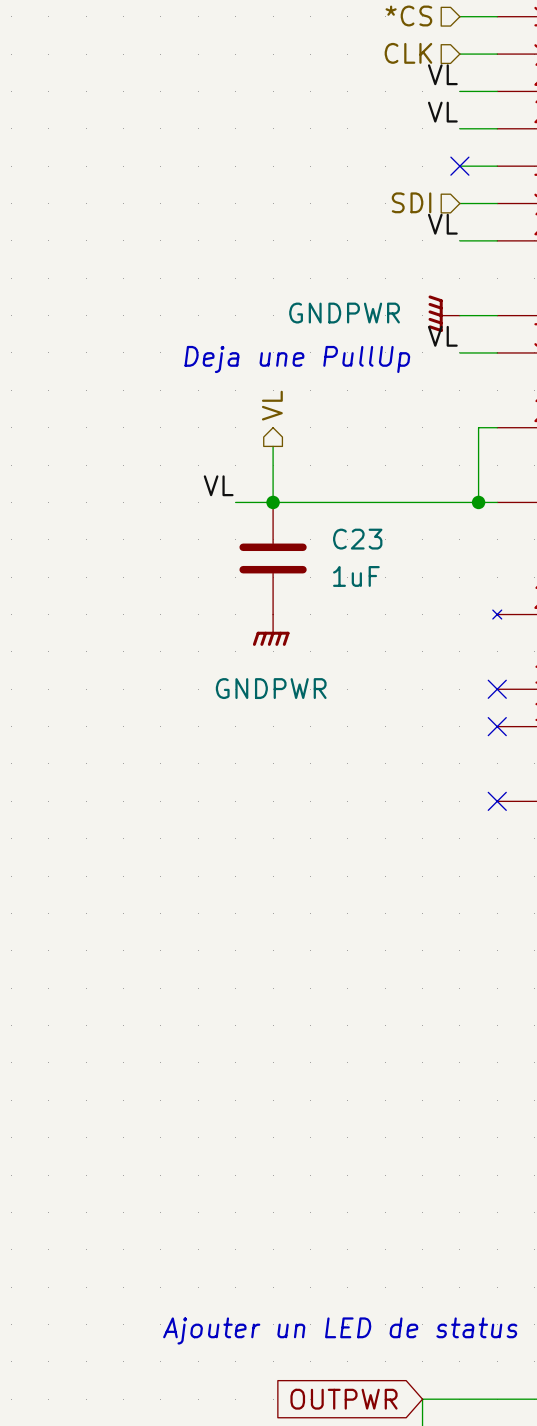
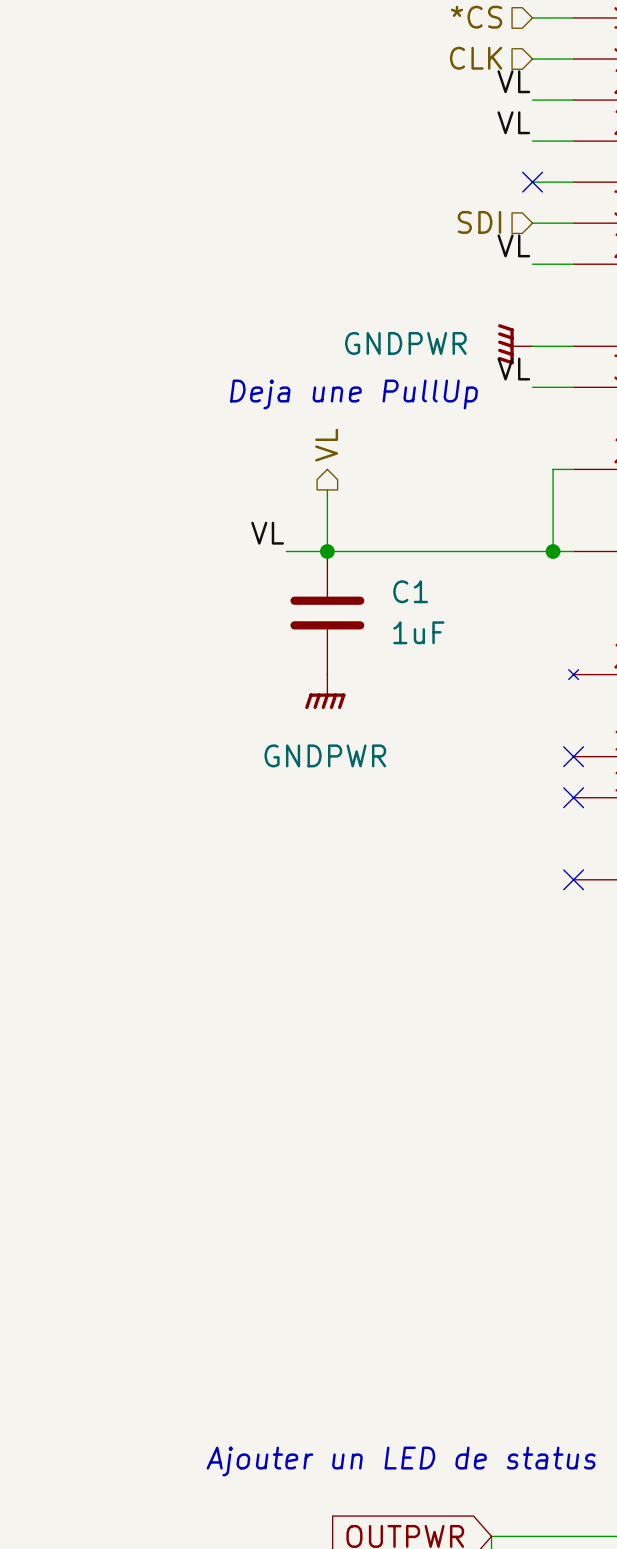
C23 name: C23 (357, 539) -> C1 (410, 591)

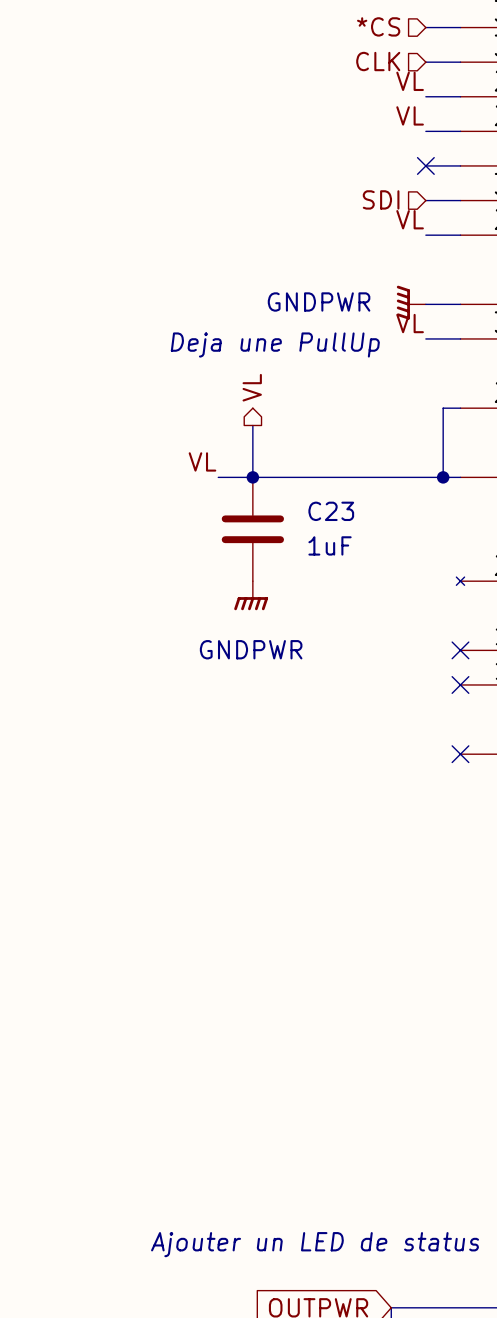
C1 name: C1 (410, 591) -> C23 (331, 511)

